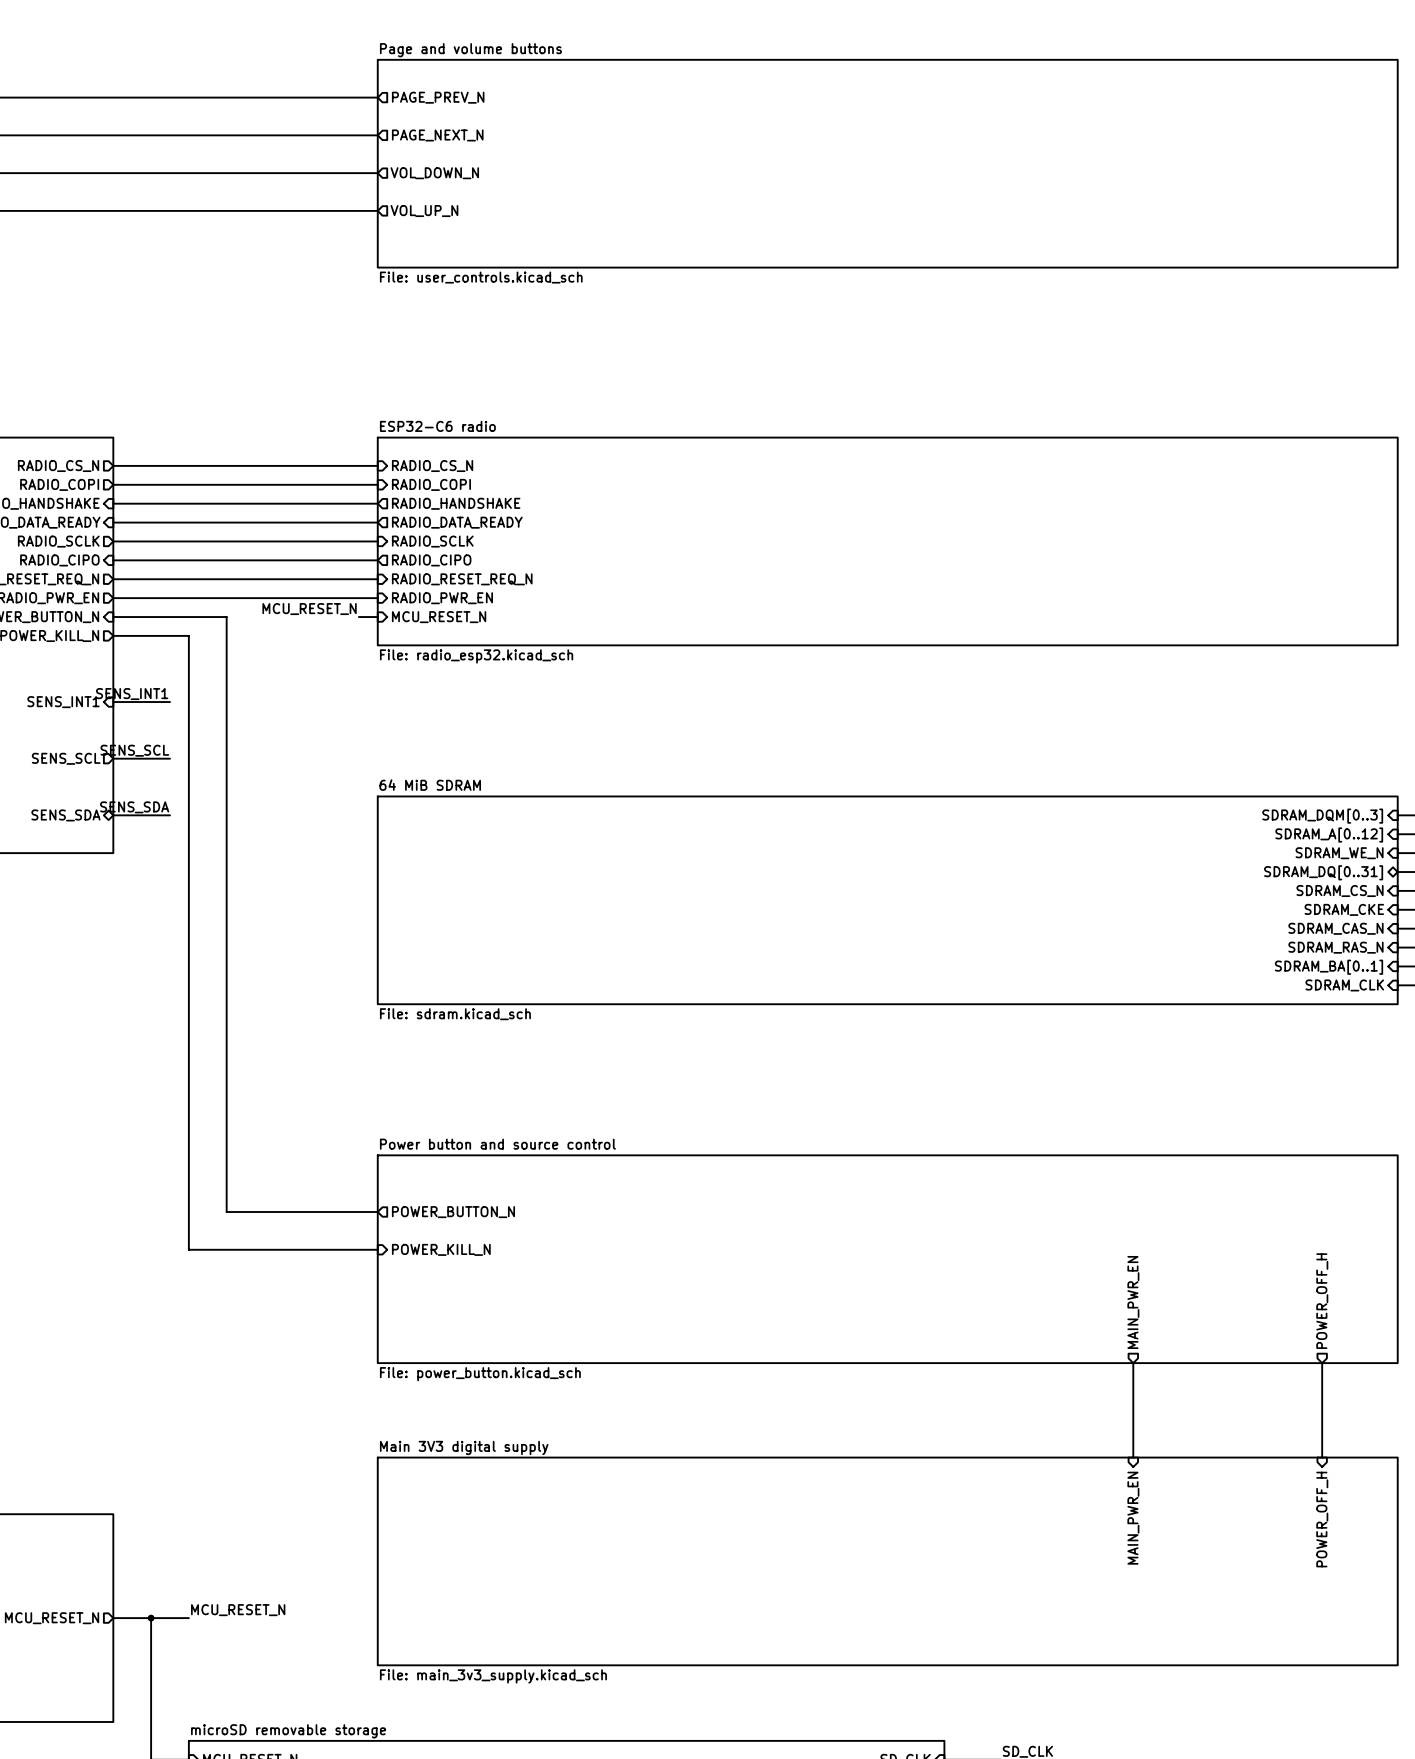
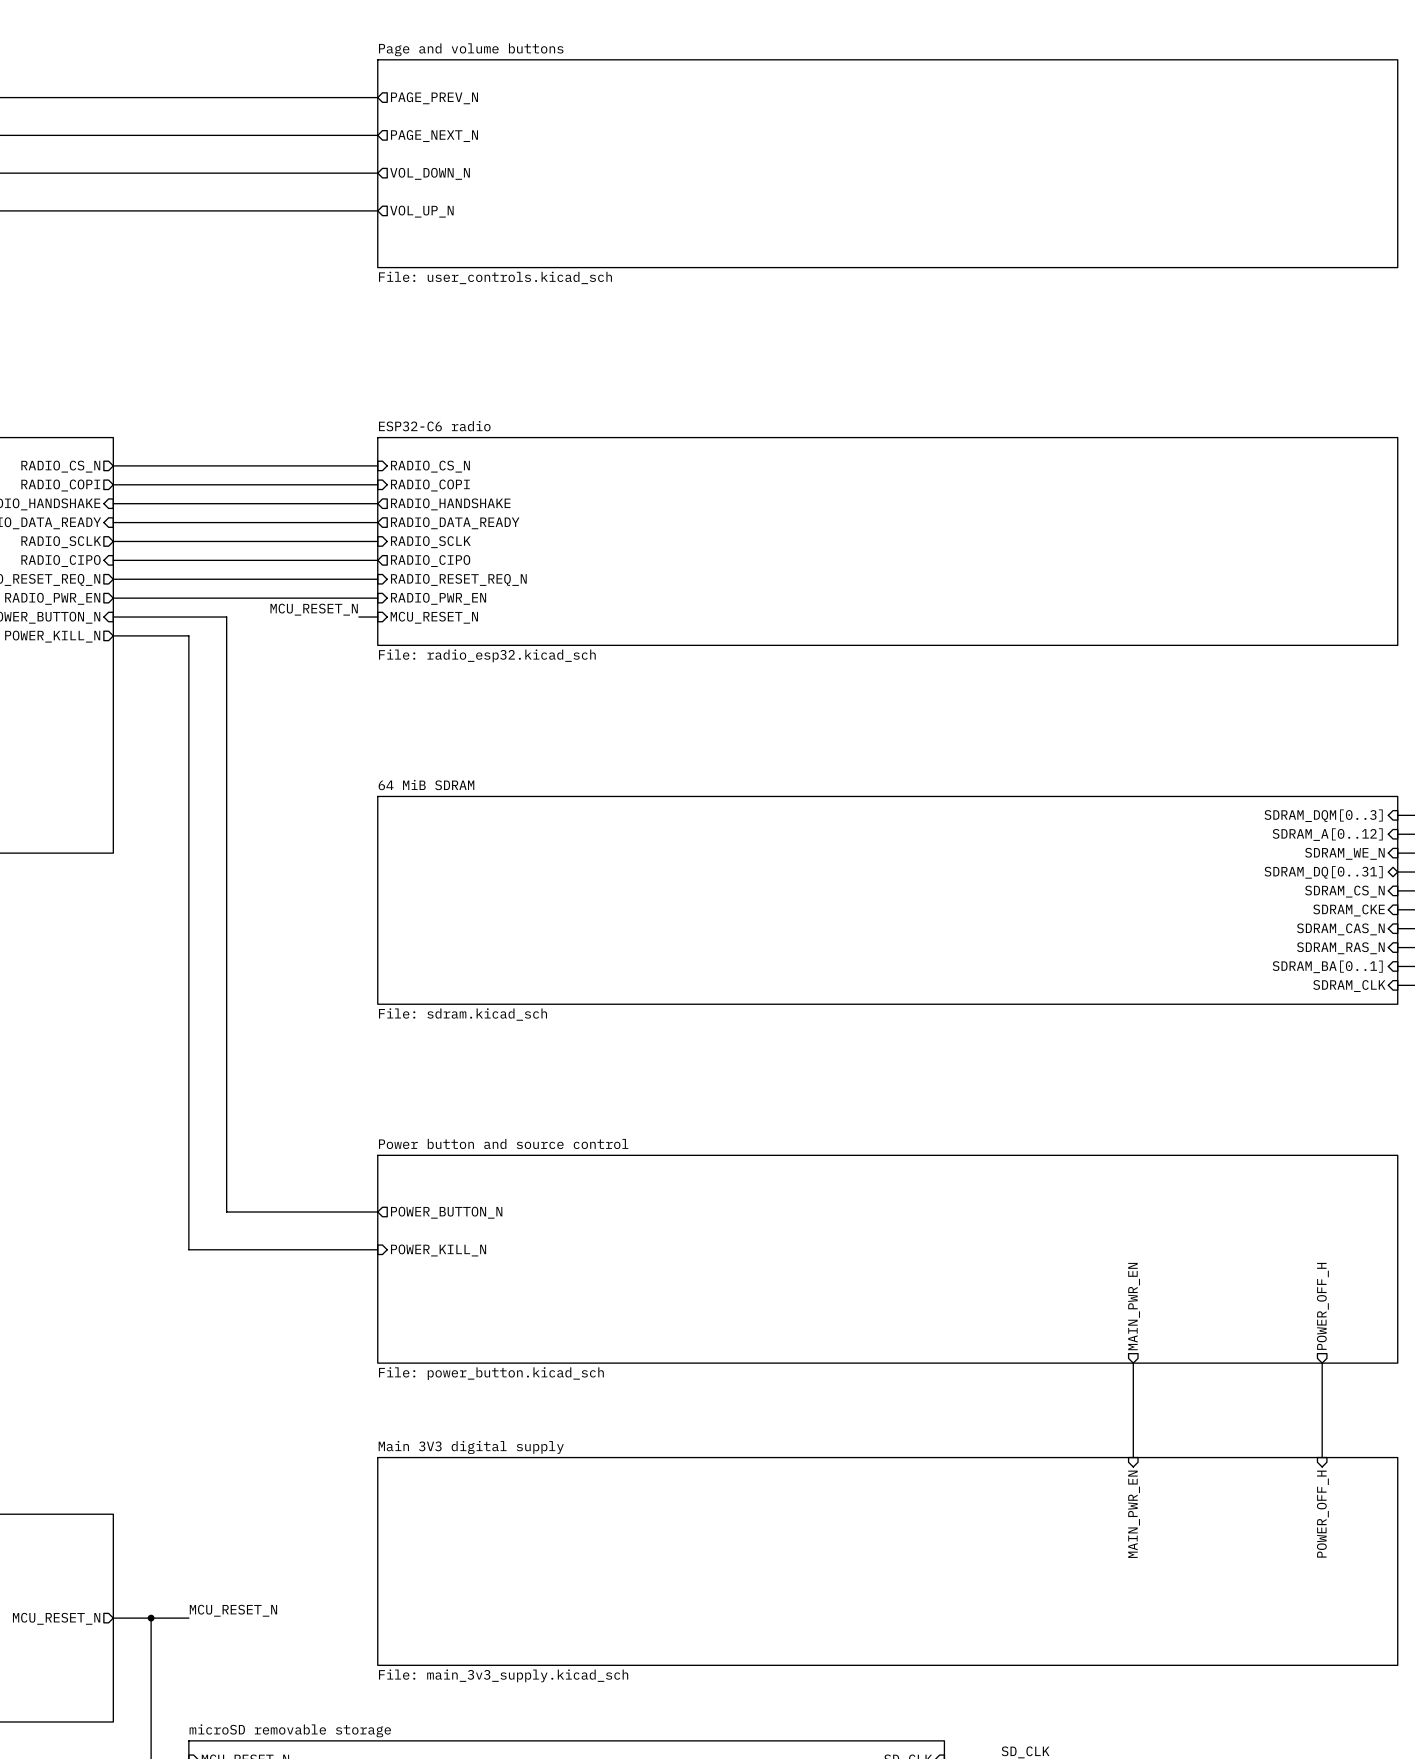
label: SENS_INT1 (132, 694) -> none
sheet pin: SENS_INT1 (63, 702) -> none
wire: (113, 702) (169, 702) -> none
label: SENS_SCL (134, 750) -> none
sheet pin: SENS_SCL (66, 758) -> none
wire: (113, 758) (169, 758) -> none
label: SENS_SDA (134, 807) -> none
sheet pin: SENS_SDA (65, 815) -> none
wire: (113, 815) (169, 815) -> none

